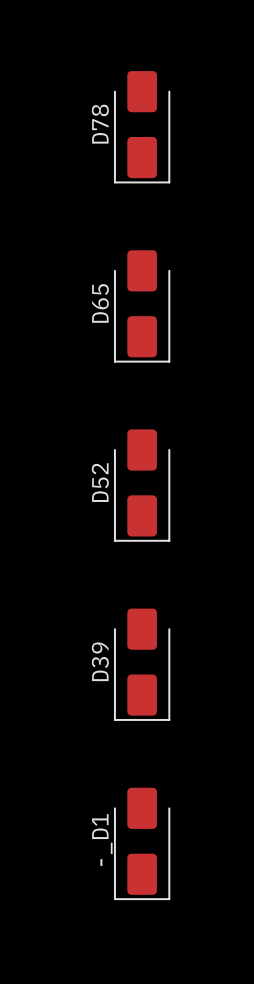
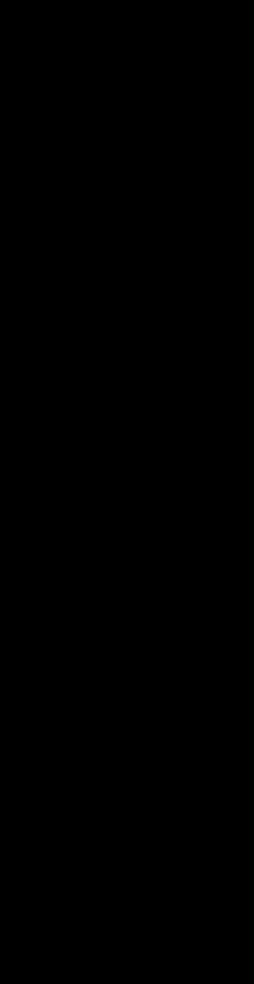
D78: (142, 127) -> none
D65: (142, 306) -> none
D52: (142, 485) -> none
D39: (142, 664) -> none
-_D1: (142, 843) -> none

